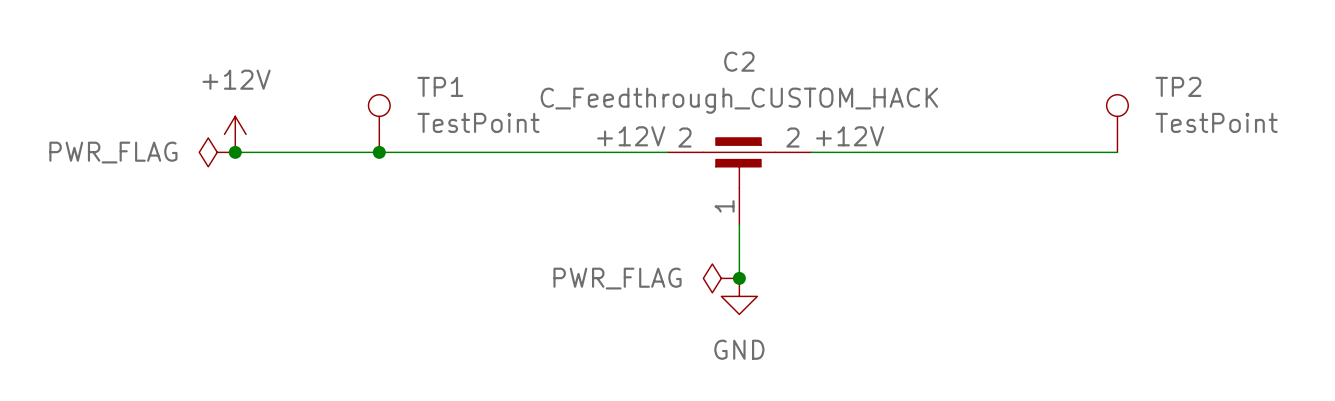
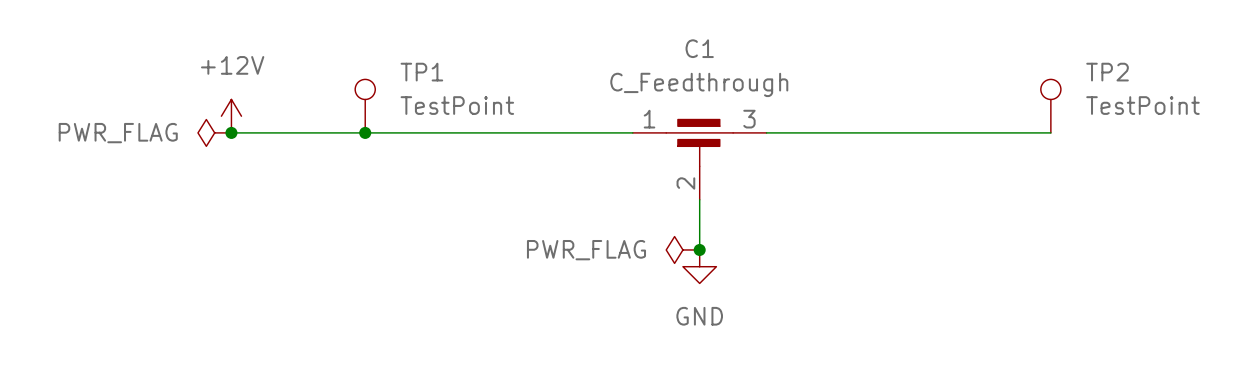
C2 name: C2 (739, 61) -> C1 (699, 48)
C2 value: C_Feedthrough_CUSTOM_HACK (739, 100) -> C_Feedthrough (699, 84)
label: +12V (631, 136) -> none
label: +12V (850, 136) -> none
C2 pin number: 2 (684, 137) -> 1 (649, 119)
C2 pin number: 2 (792, 137) -> 3 (749, 119)
C2 pin number: 1 (724, 206) -> 2 (685, 183)

